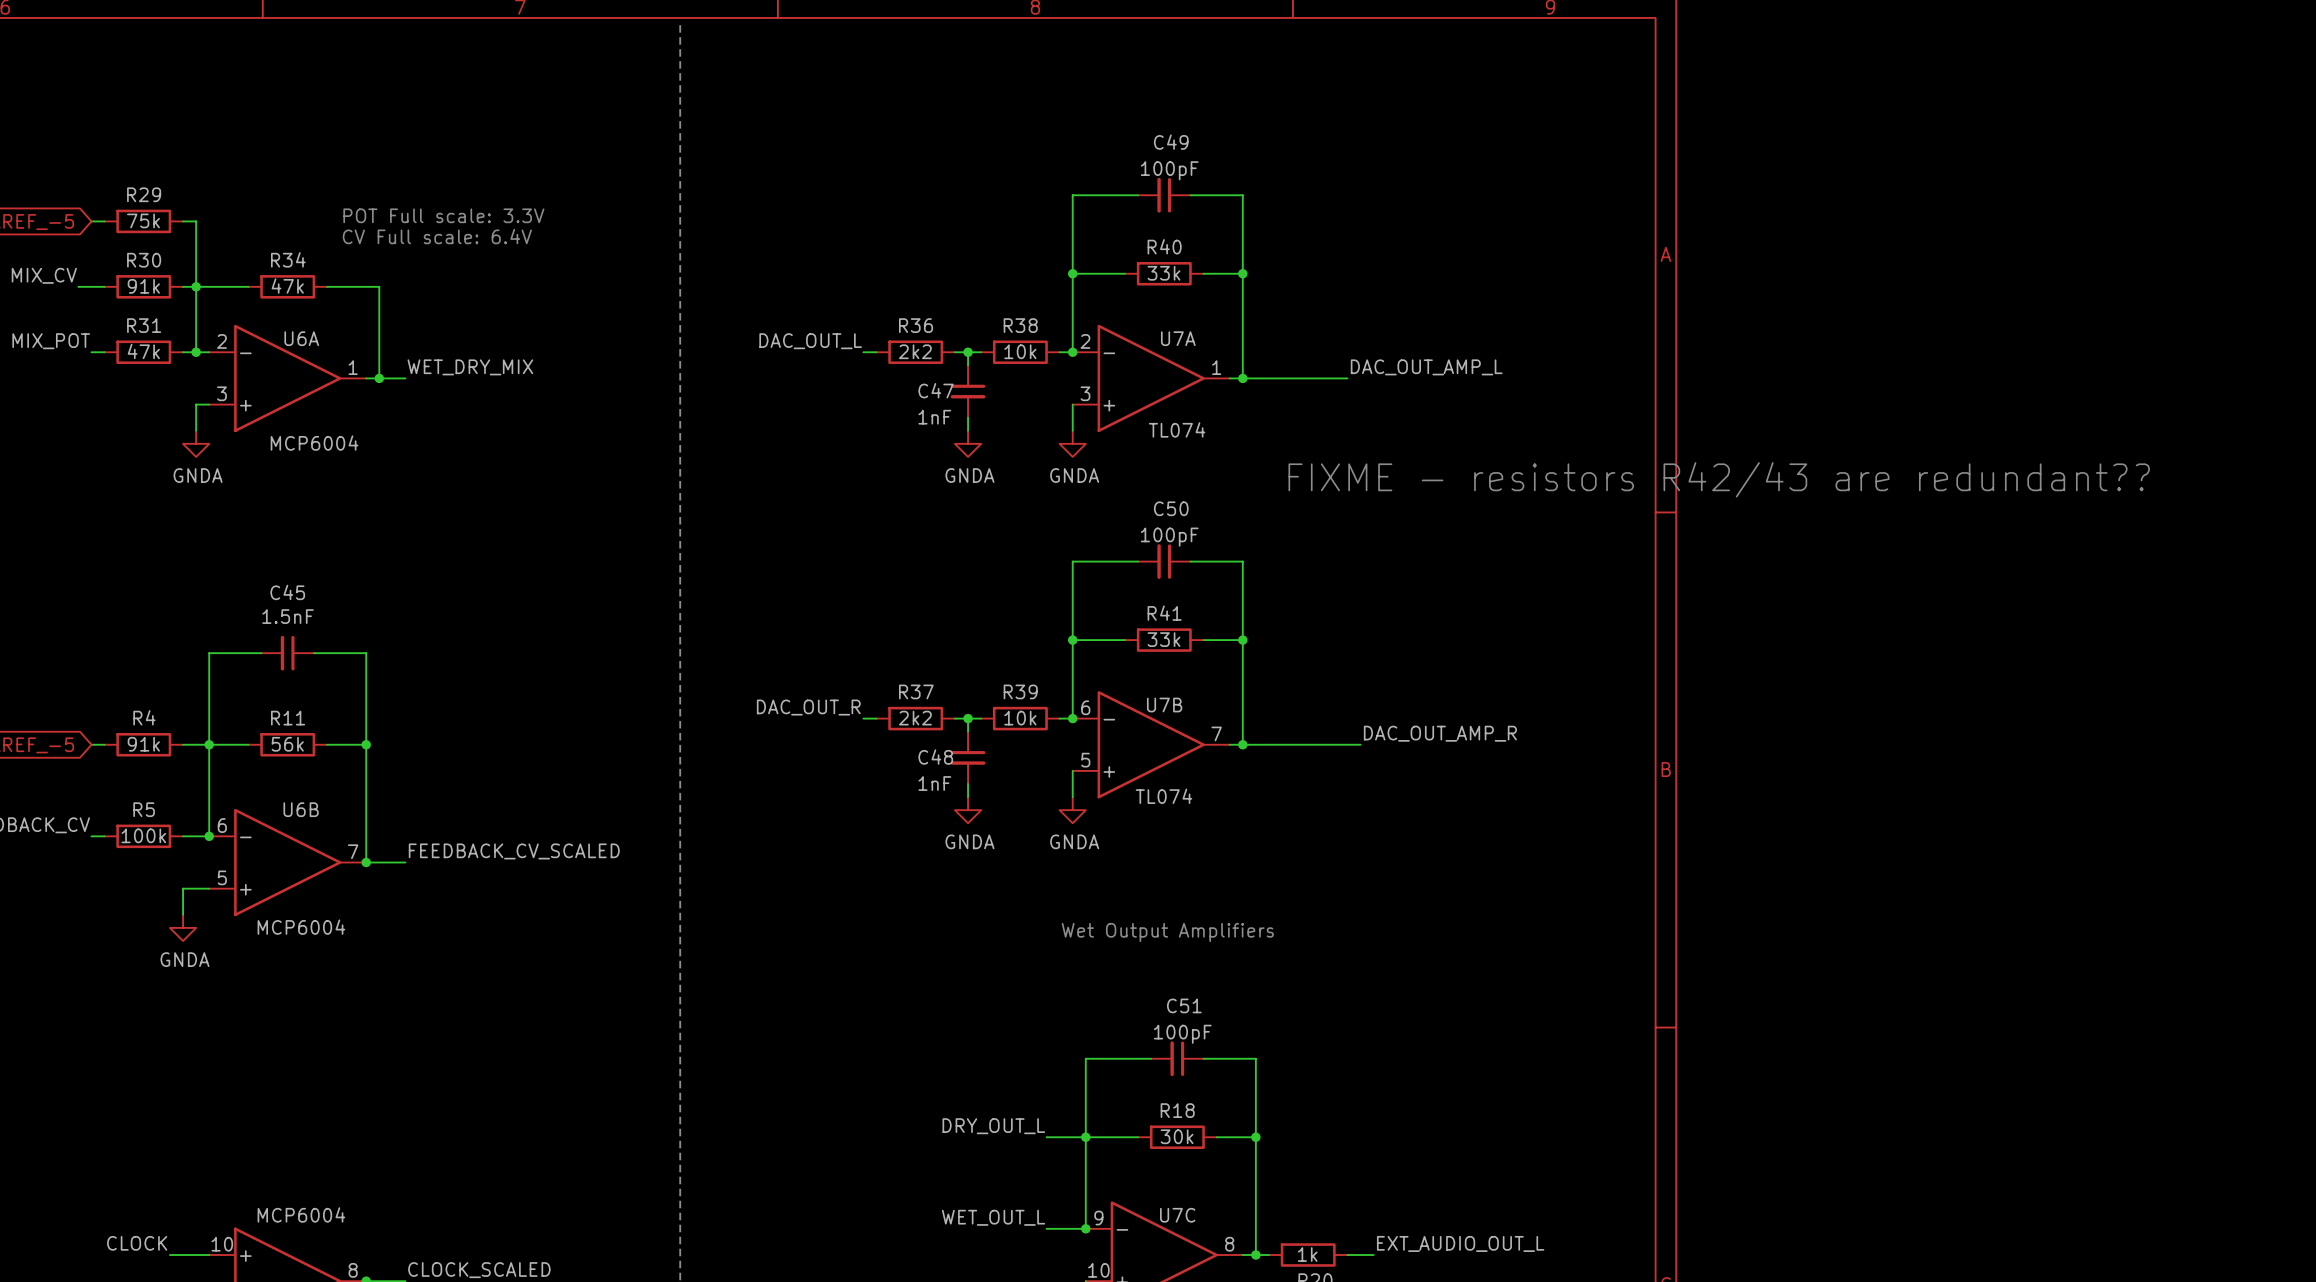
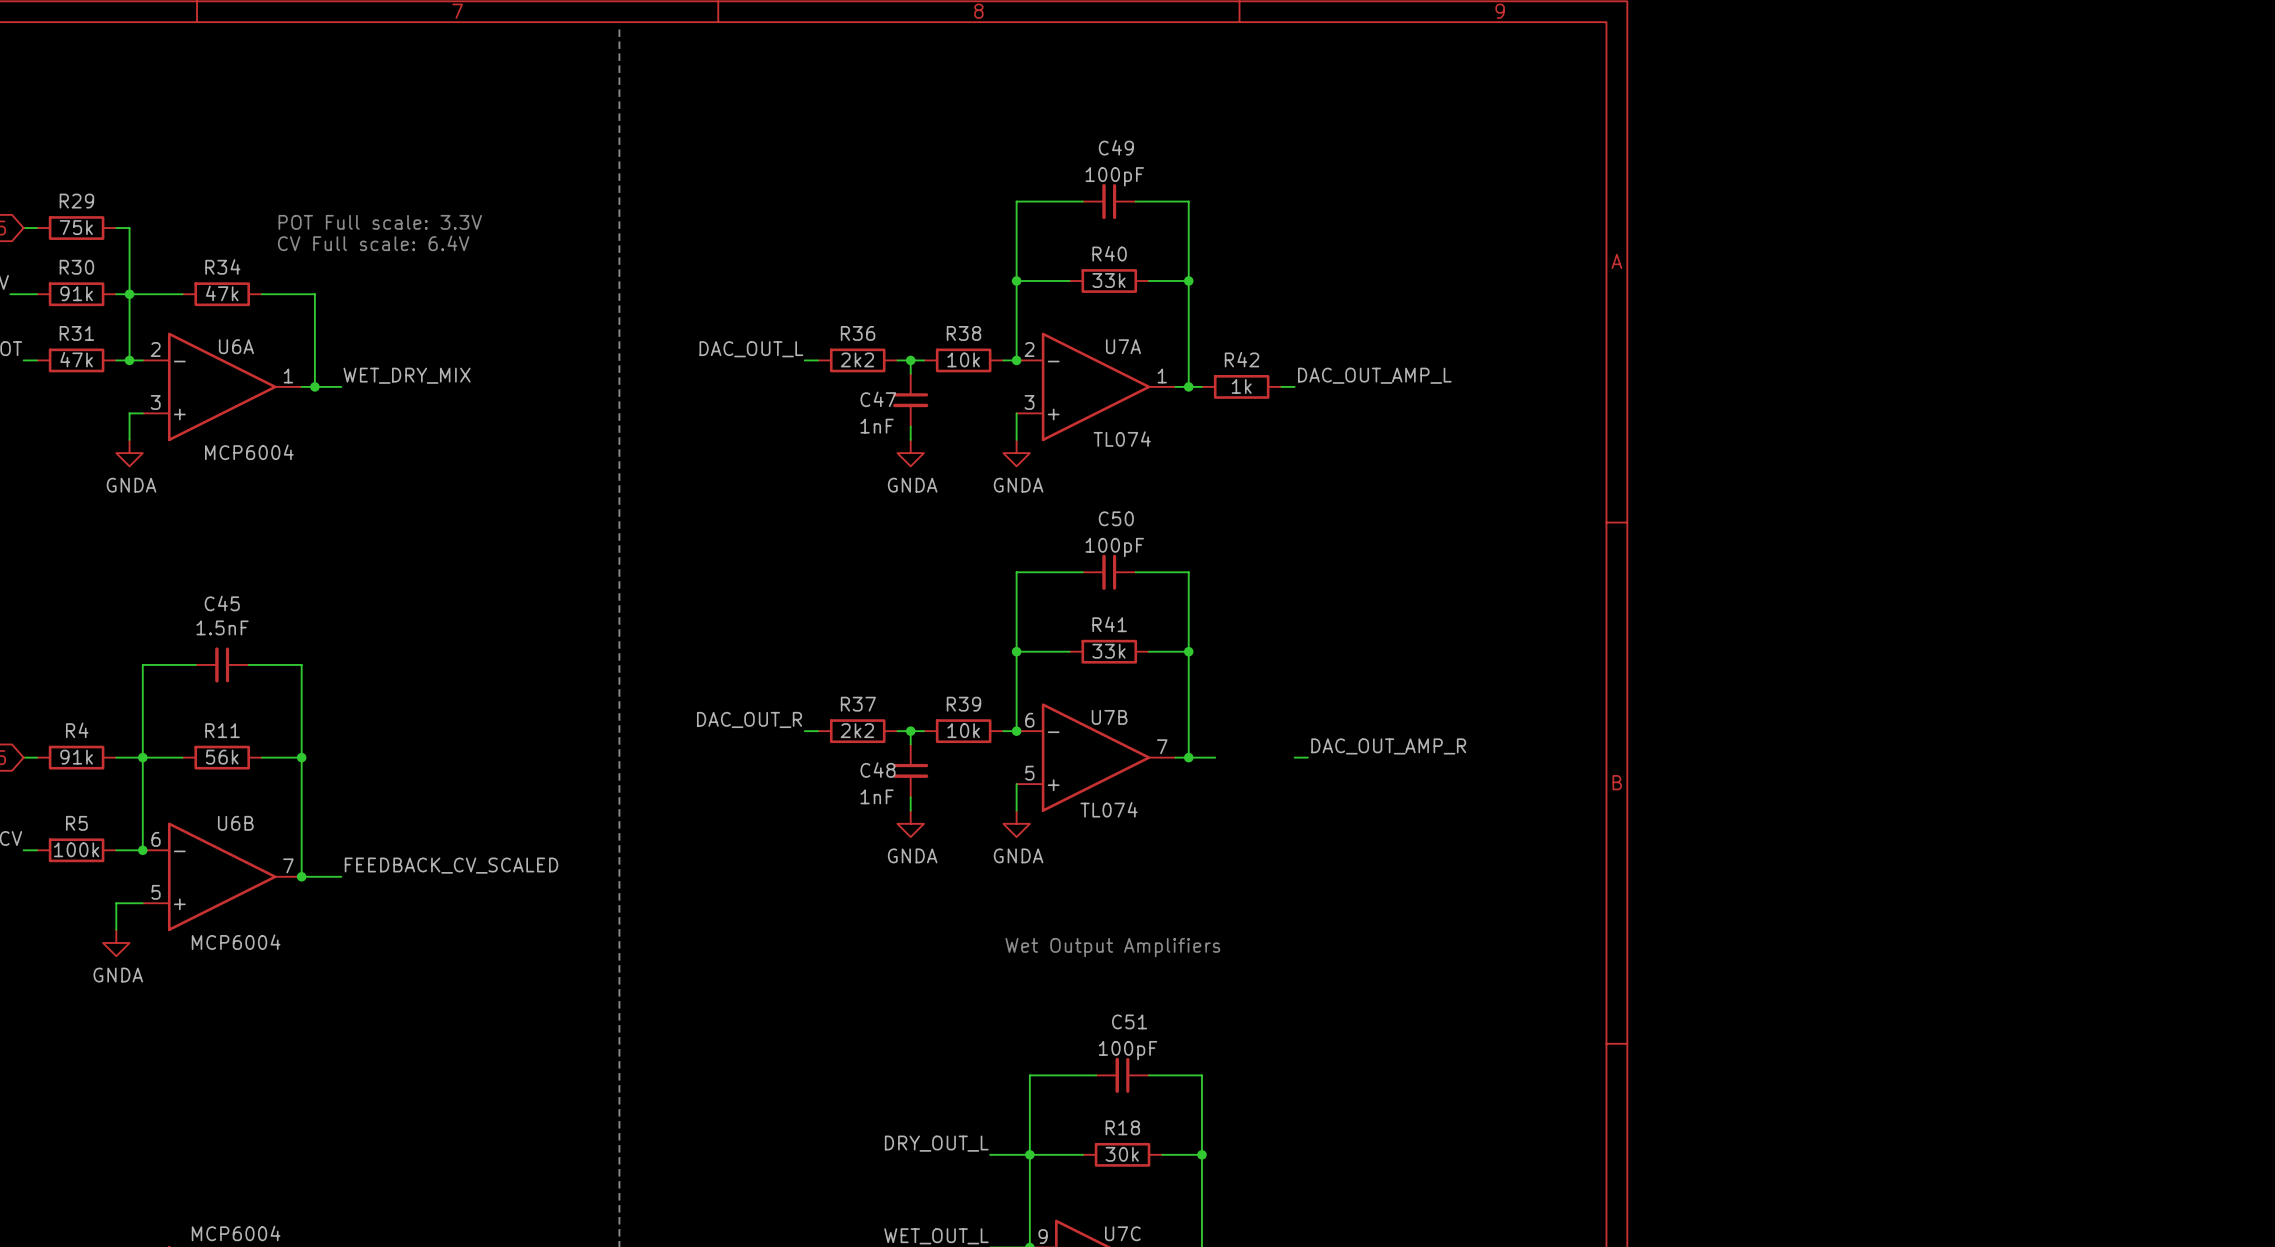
wire: (1255, 378) (1334, 378) -> none
R42: none -> 1k (1241, 386)
text: FIXME - resistors R42/43 are redundant?? (1719, 479) -> none
wire: (1268, 744) (1347, 744) -> none

